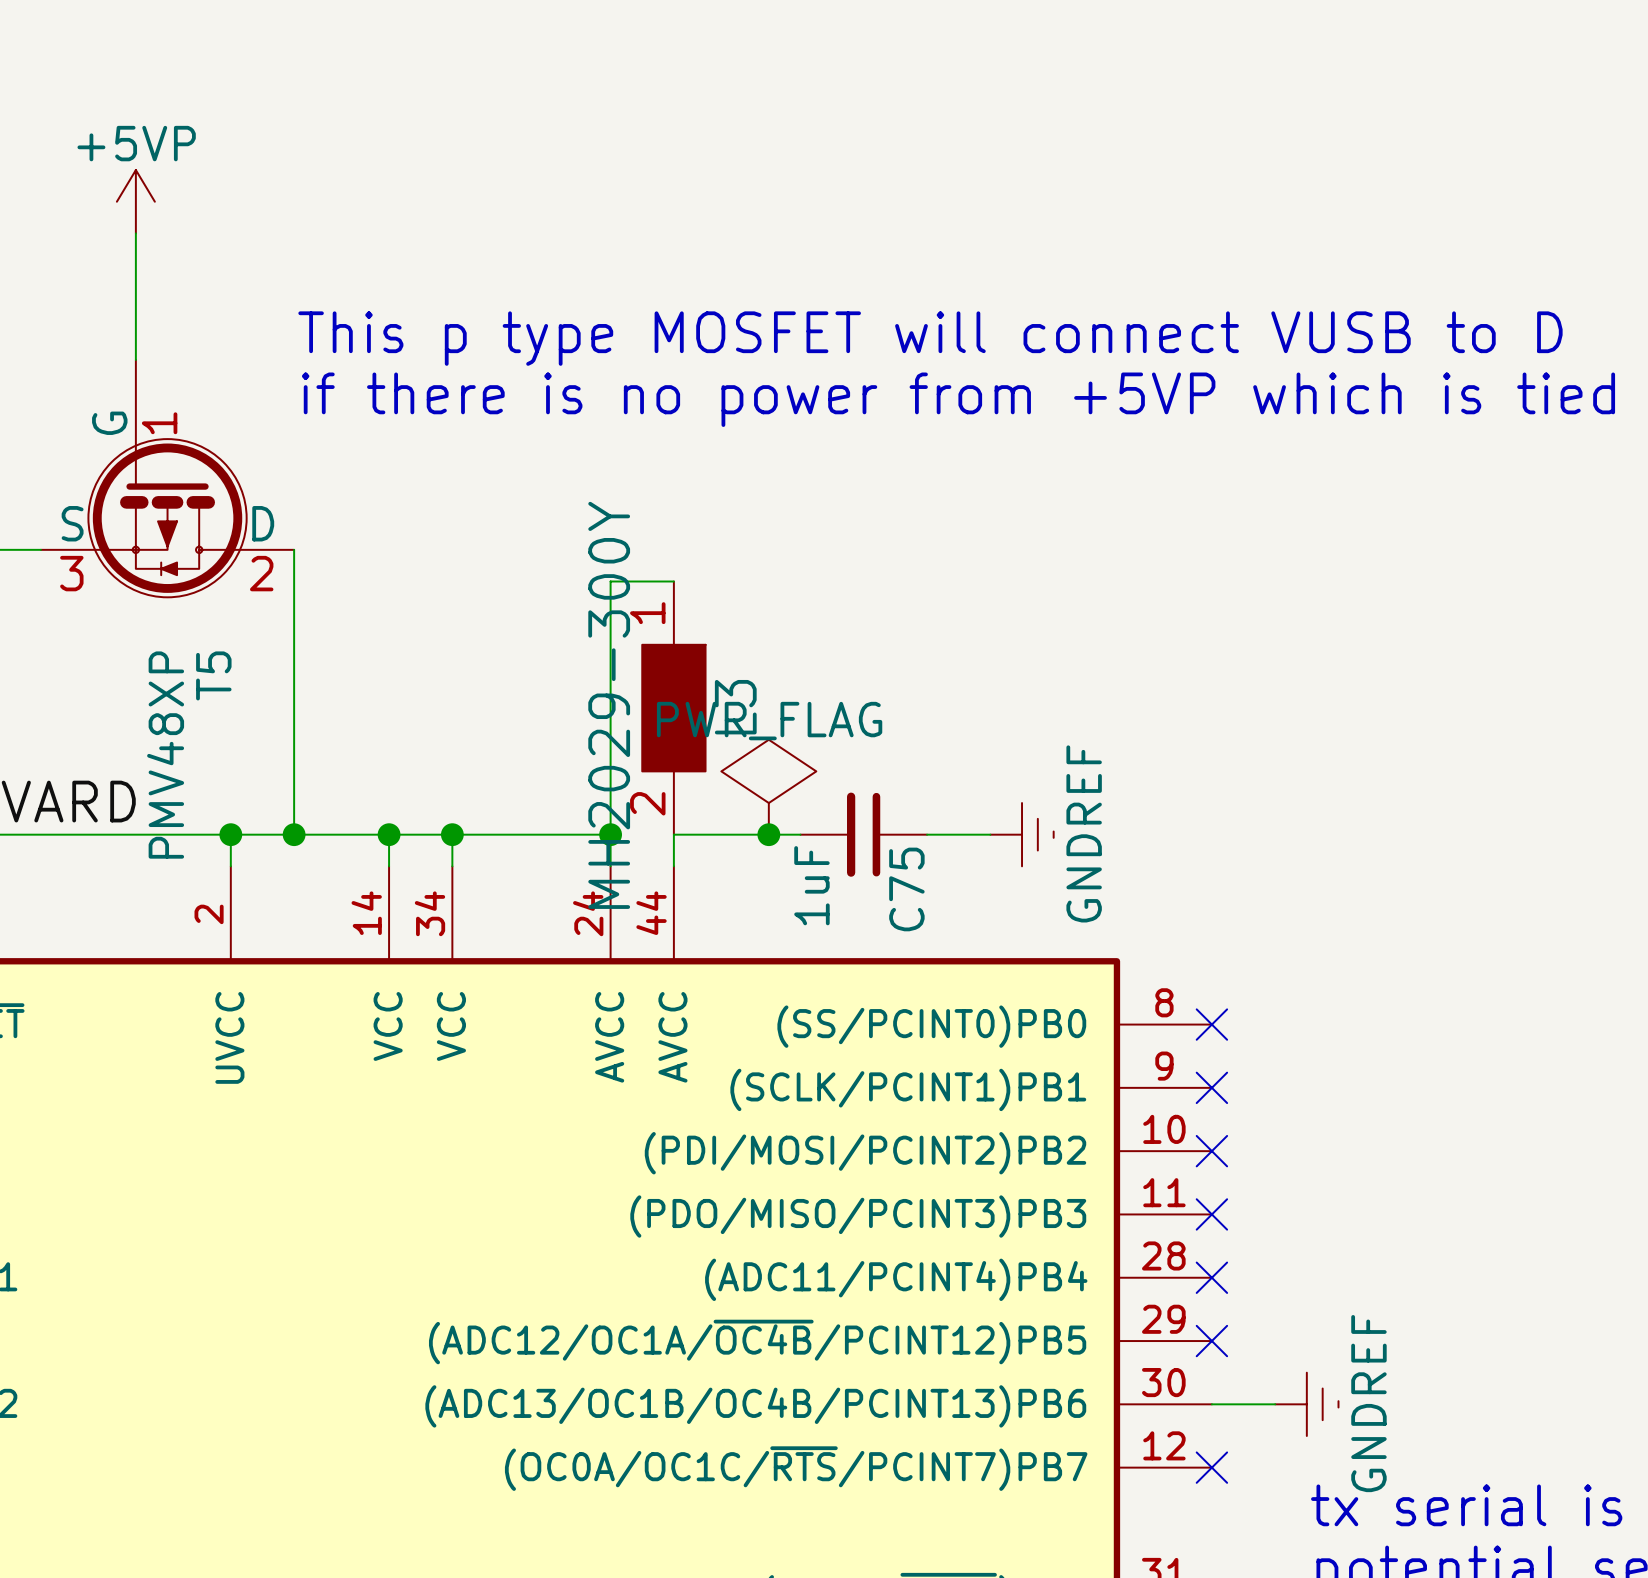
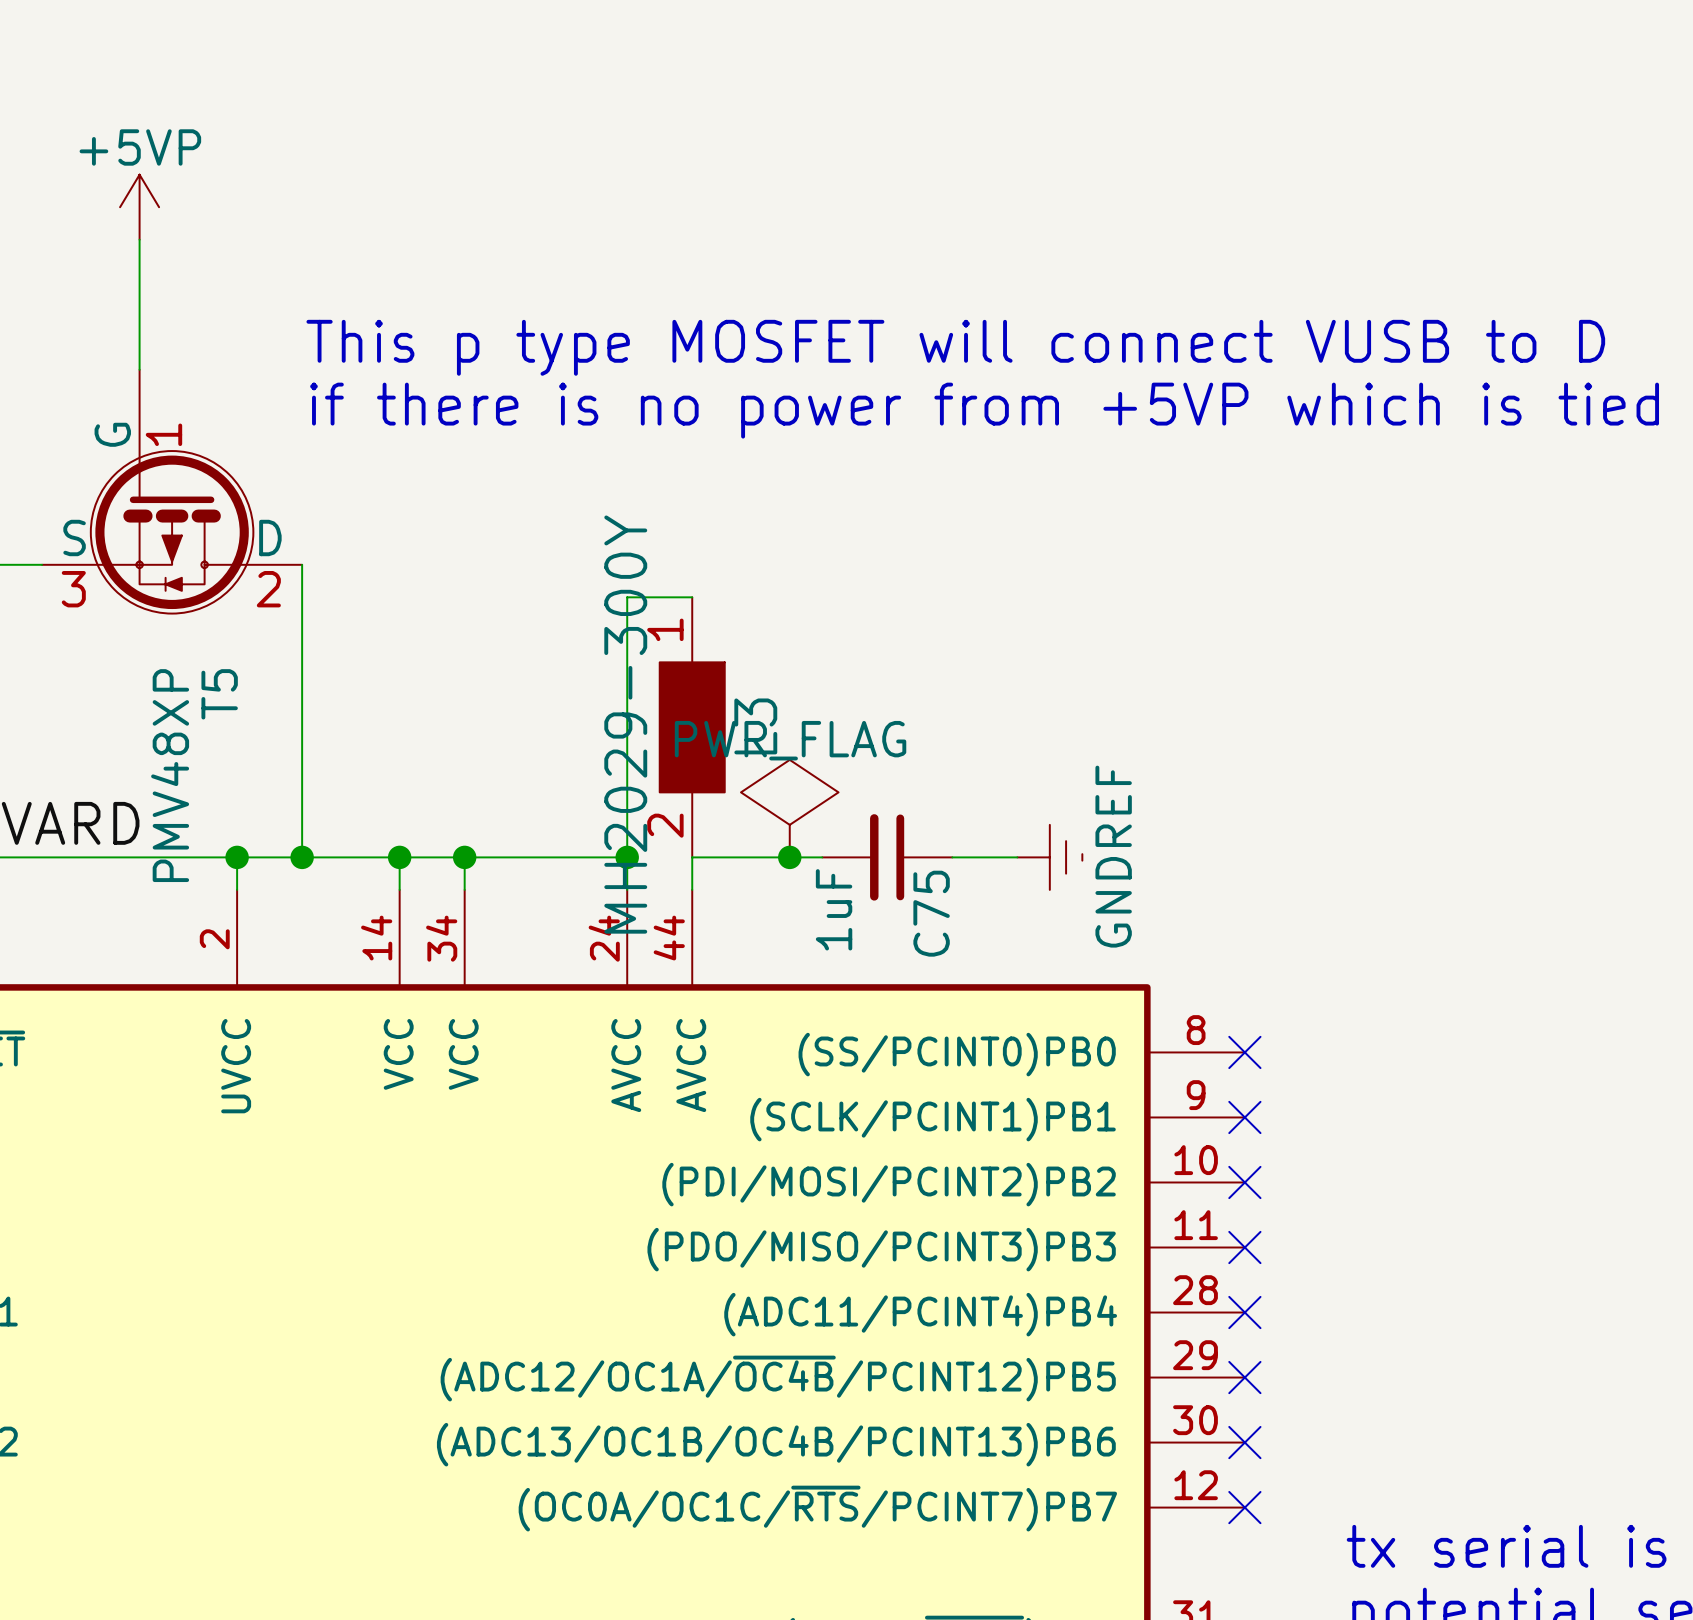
wire: (1211, 1404) (1275, 1404) -> none
no-connect mark: none -> (1244, 1442)
power symbol: GNDREF (1306, 1404) -> none

